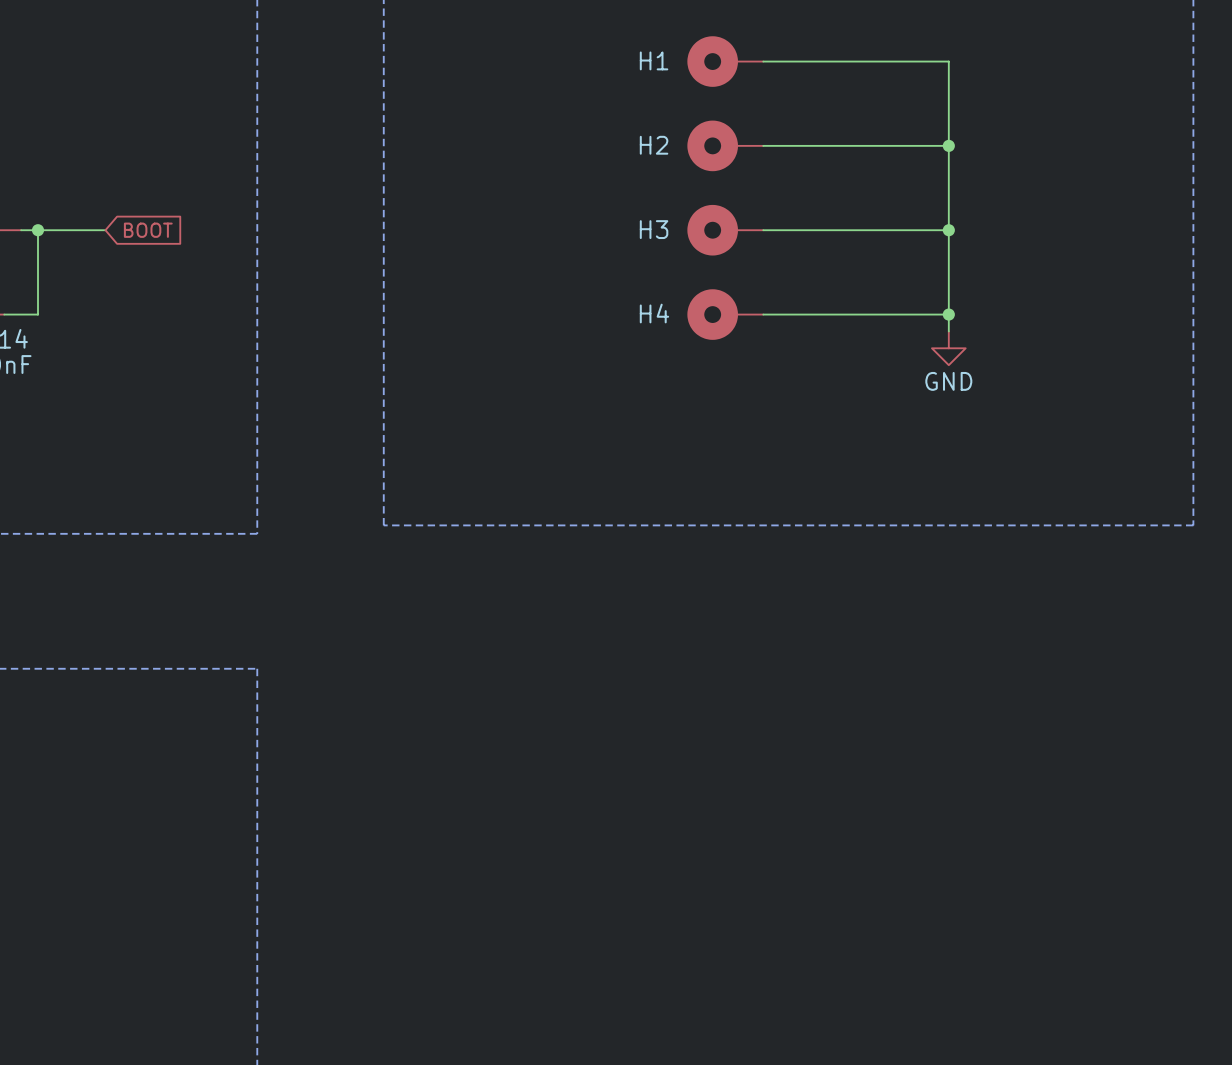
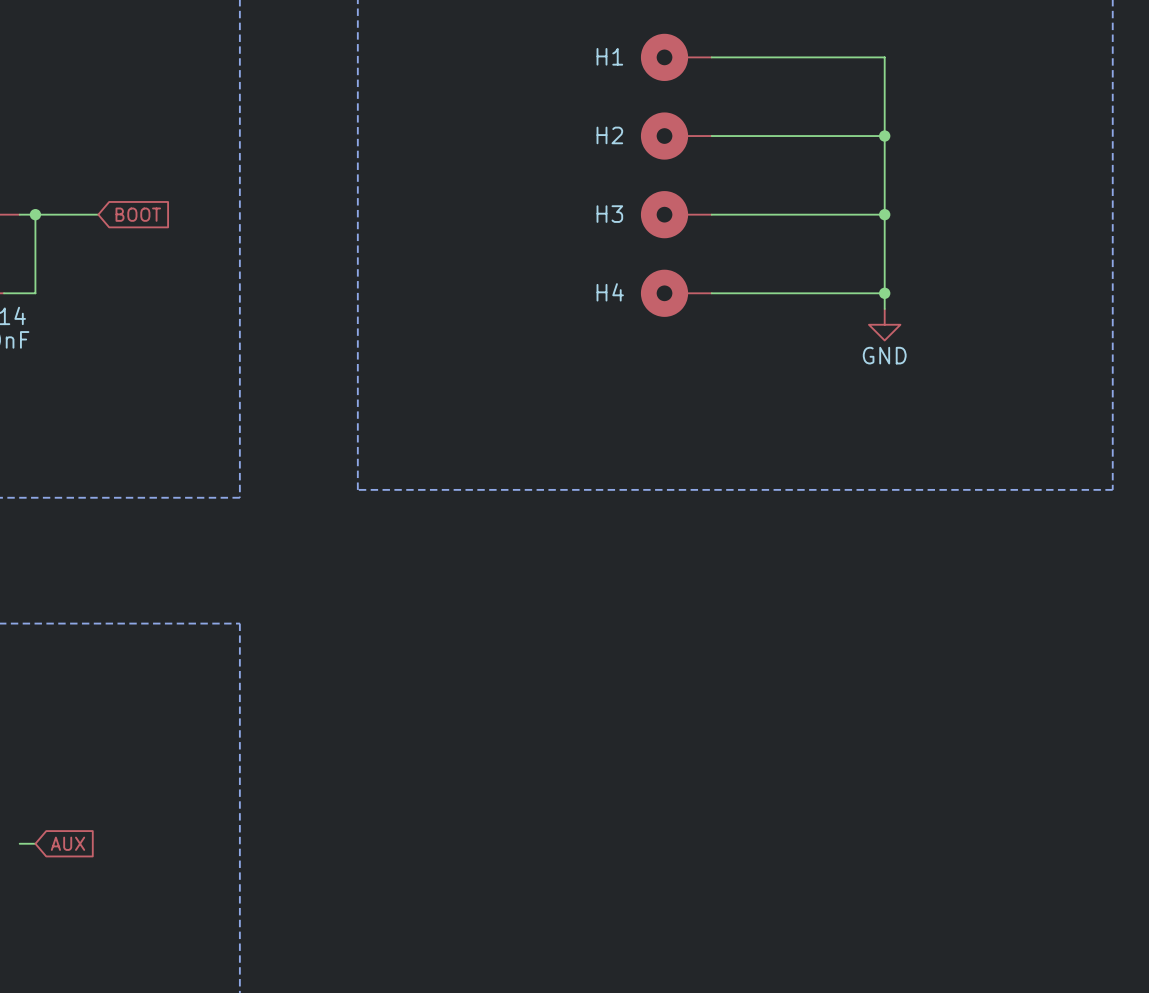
wire: none -> (19, 843) (35, 843)
global label: none -> AUX (67, 843)

